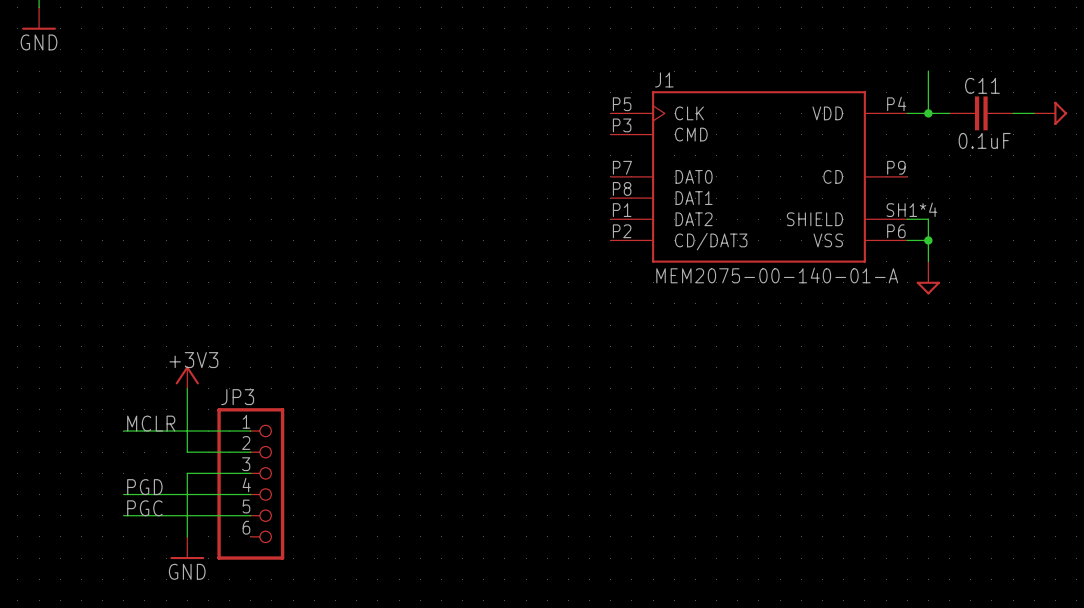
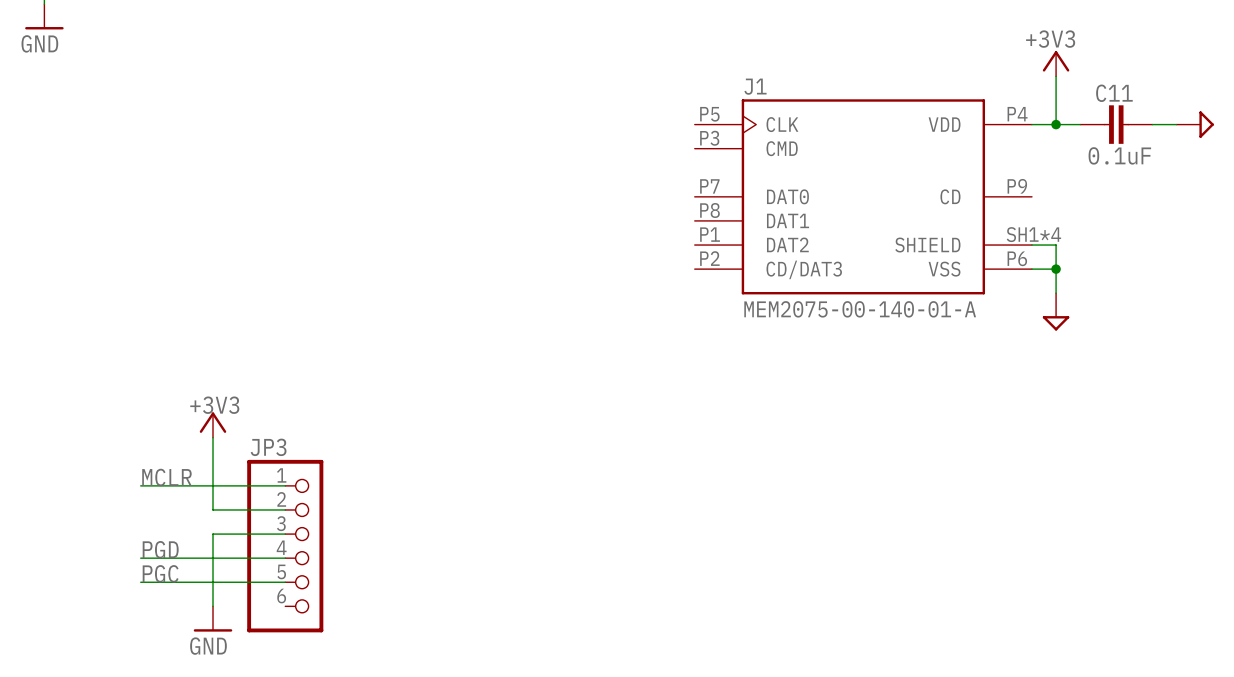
power symbol: none -> +3V3 (1056, 63)

